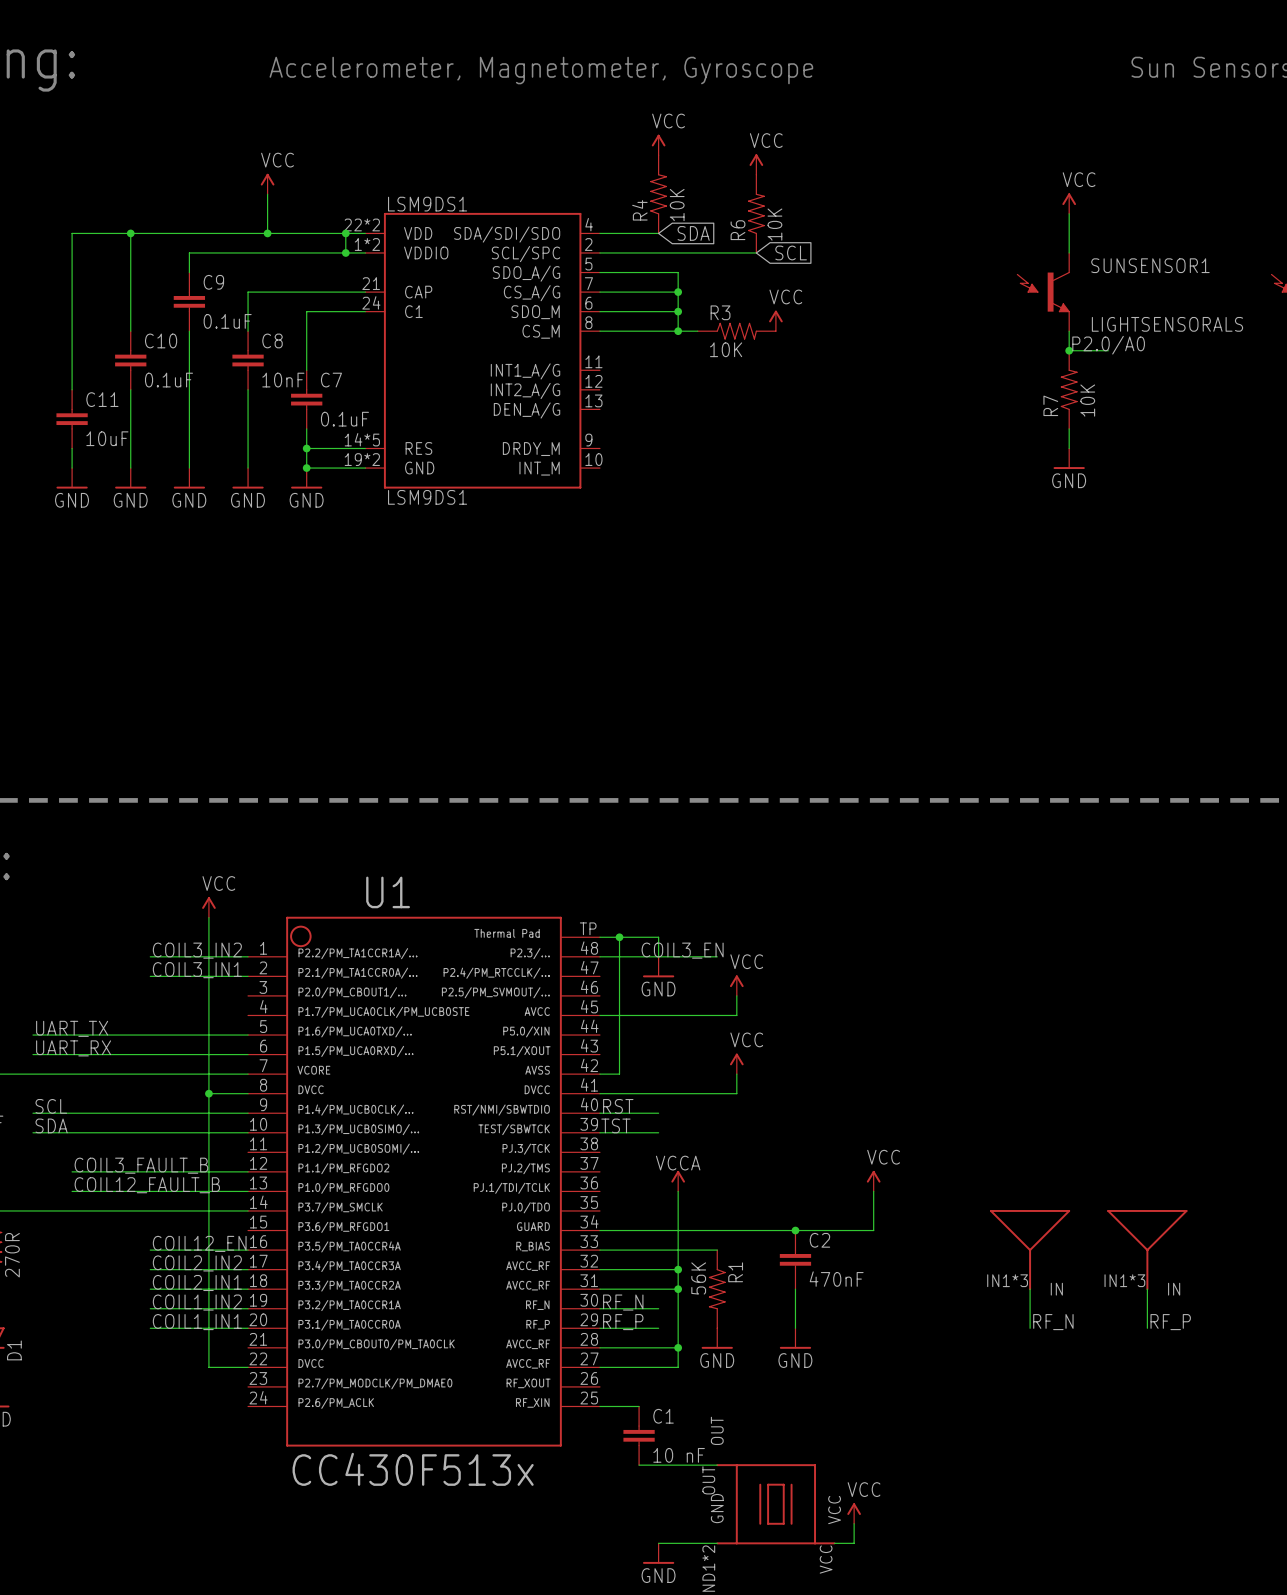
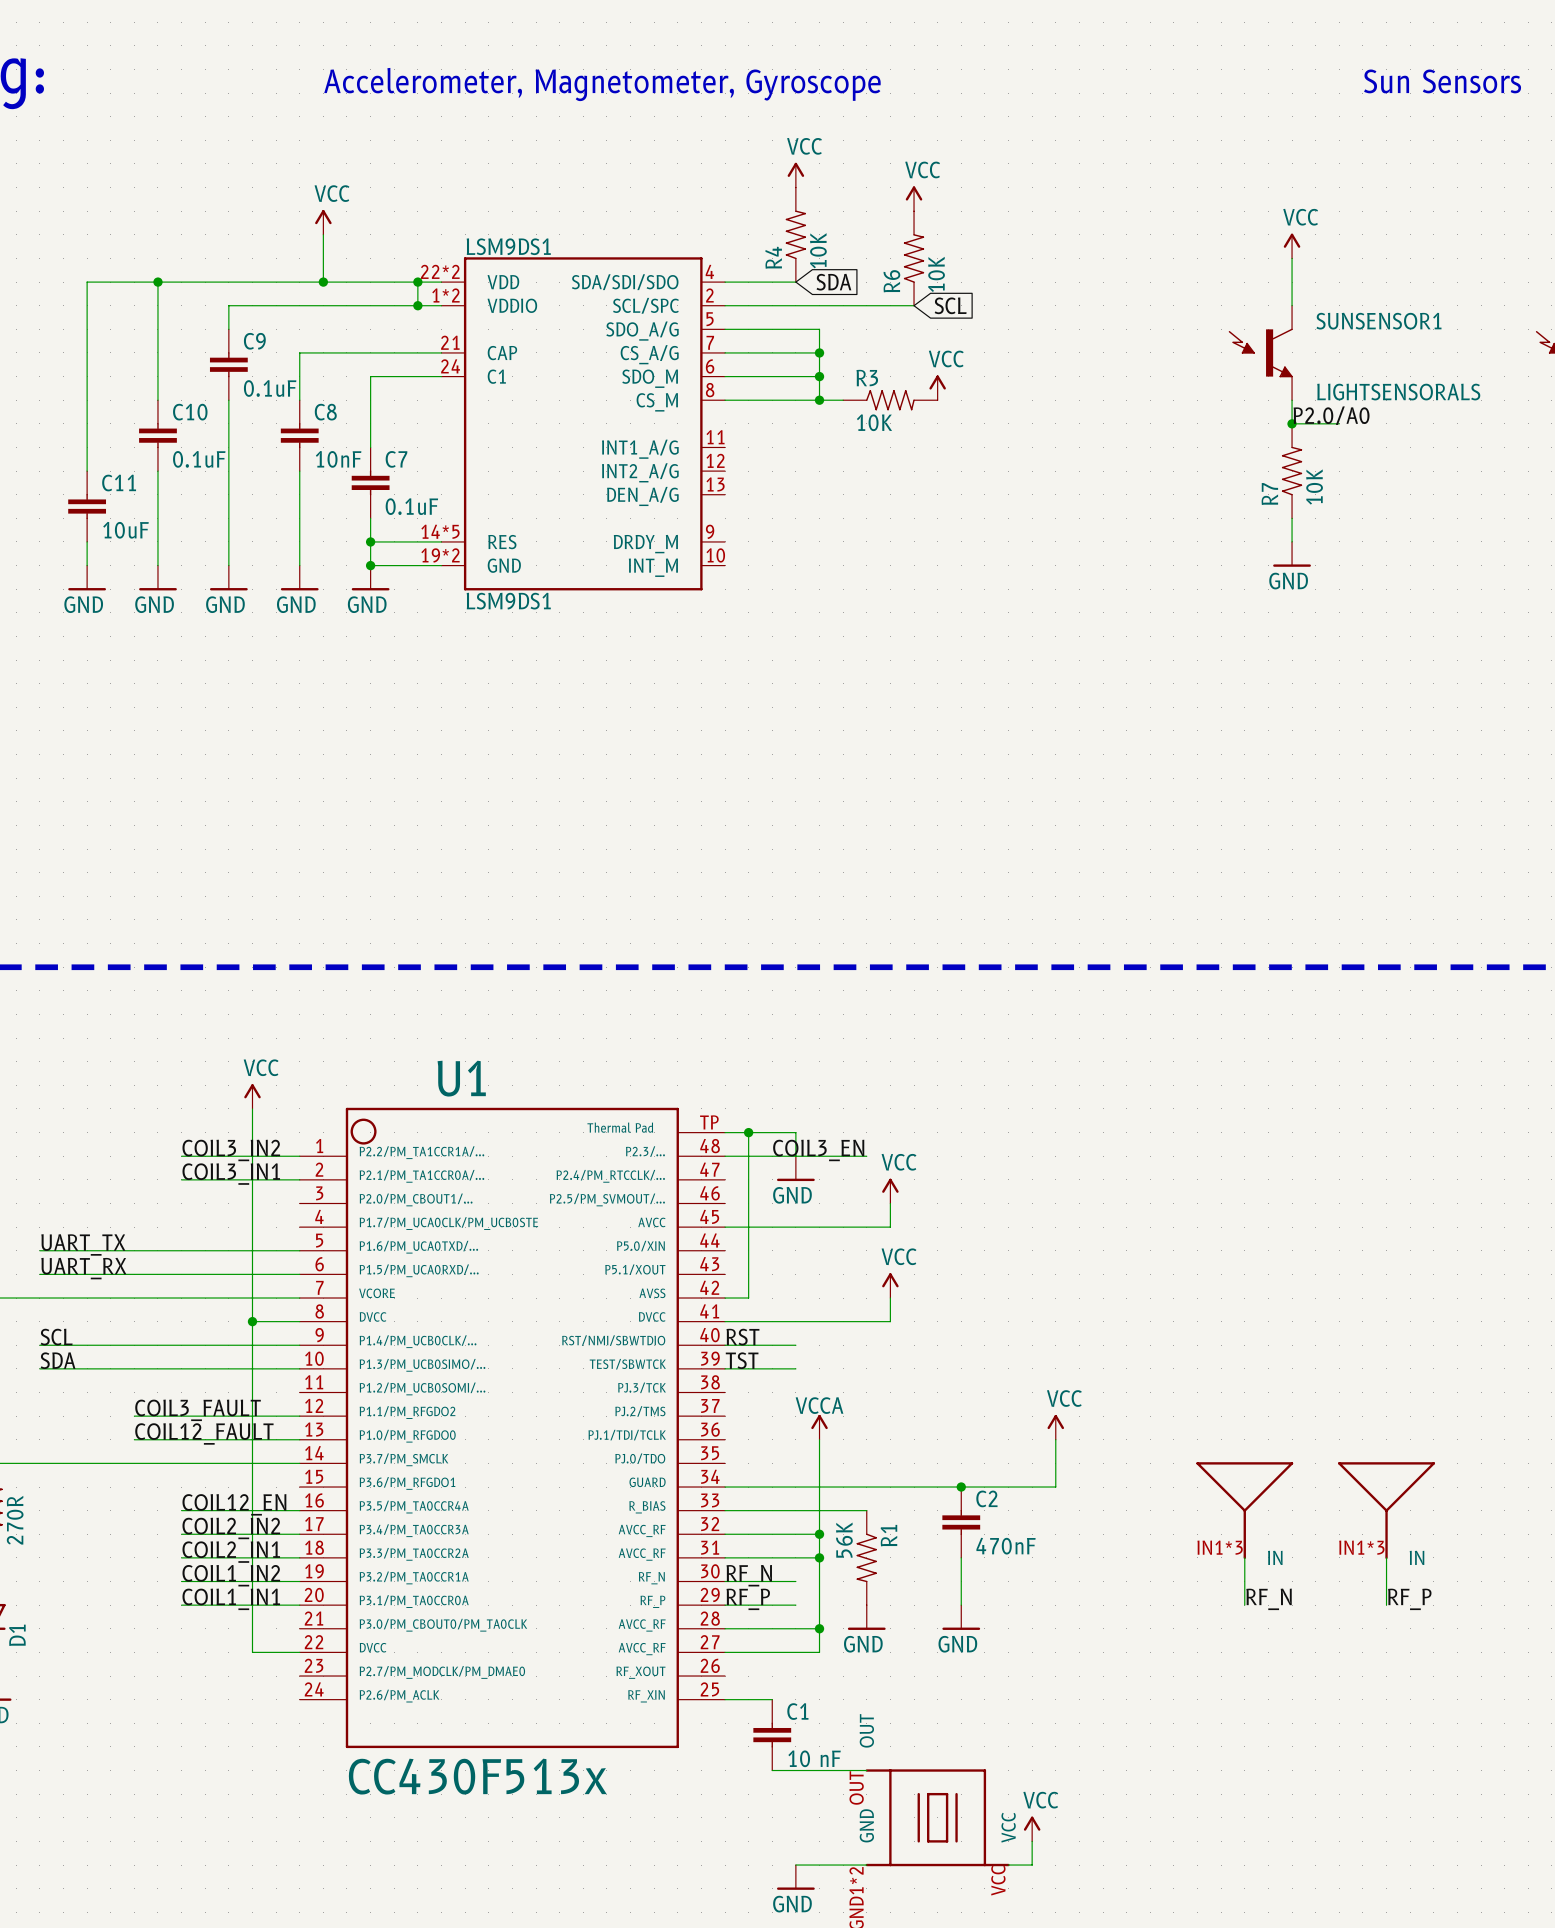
label: COIL3_FAULT_B (141, 1165) -> none
label: none -> COIL3_FAULT (198, 1410)
wire: (72, 1171) (111, 1171) -> none
label: COIL12_FAULT_B (147, 1185) -> none
label: none -> COIL12_FAULT (204, 1433)
wire: (72, 1191) (111, 1191) -> none

